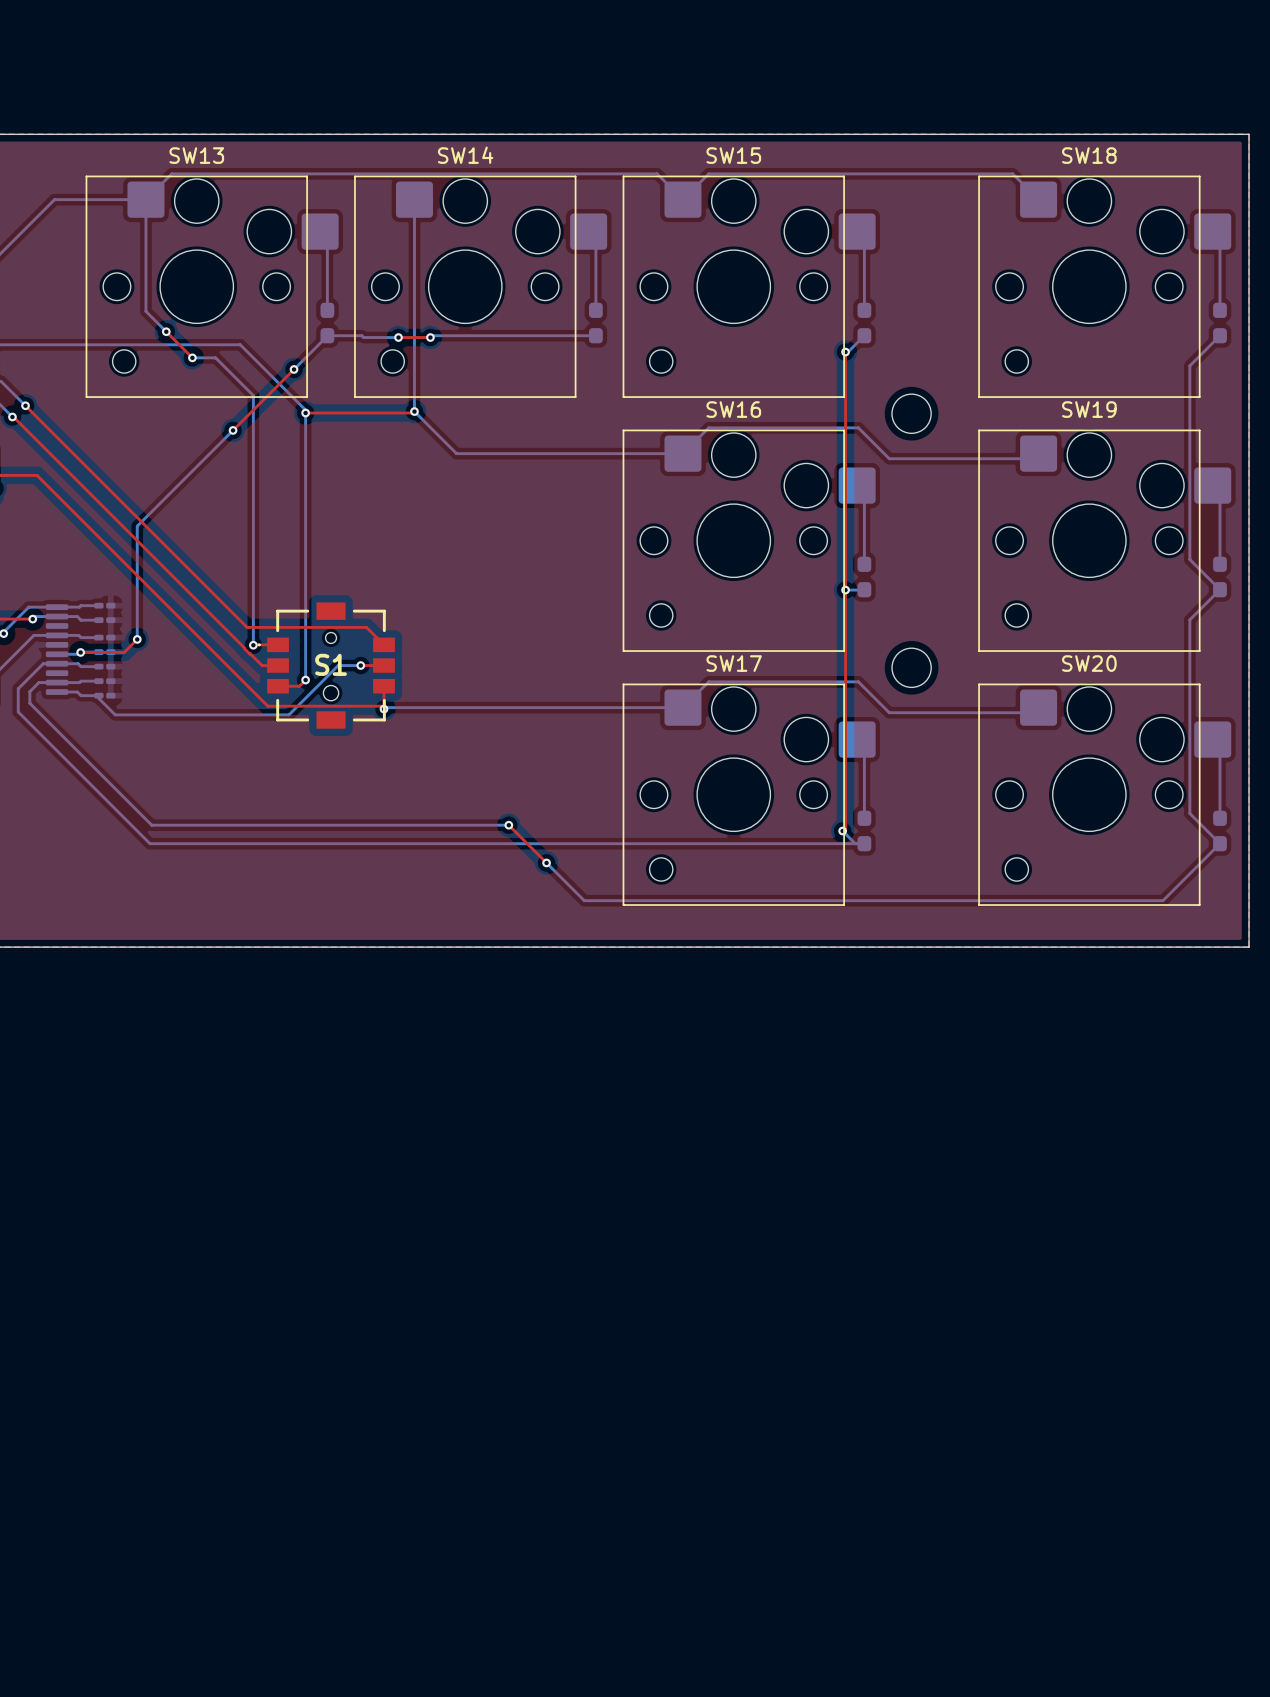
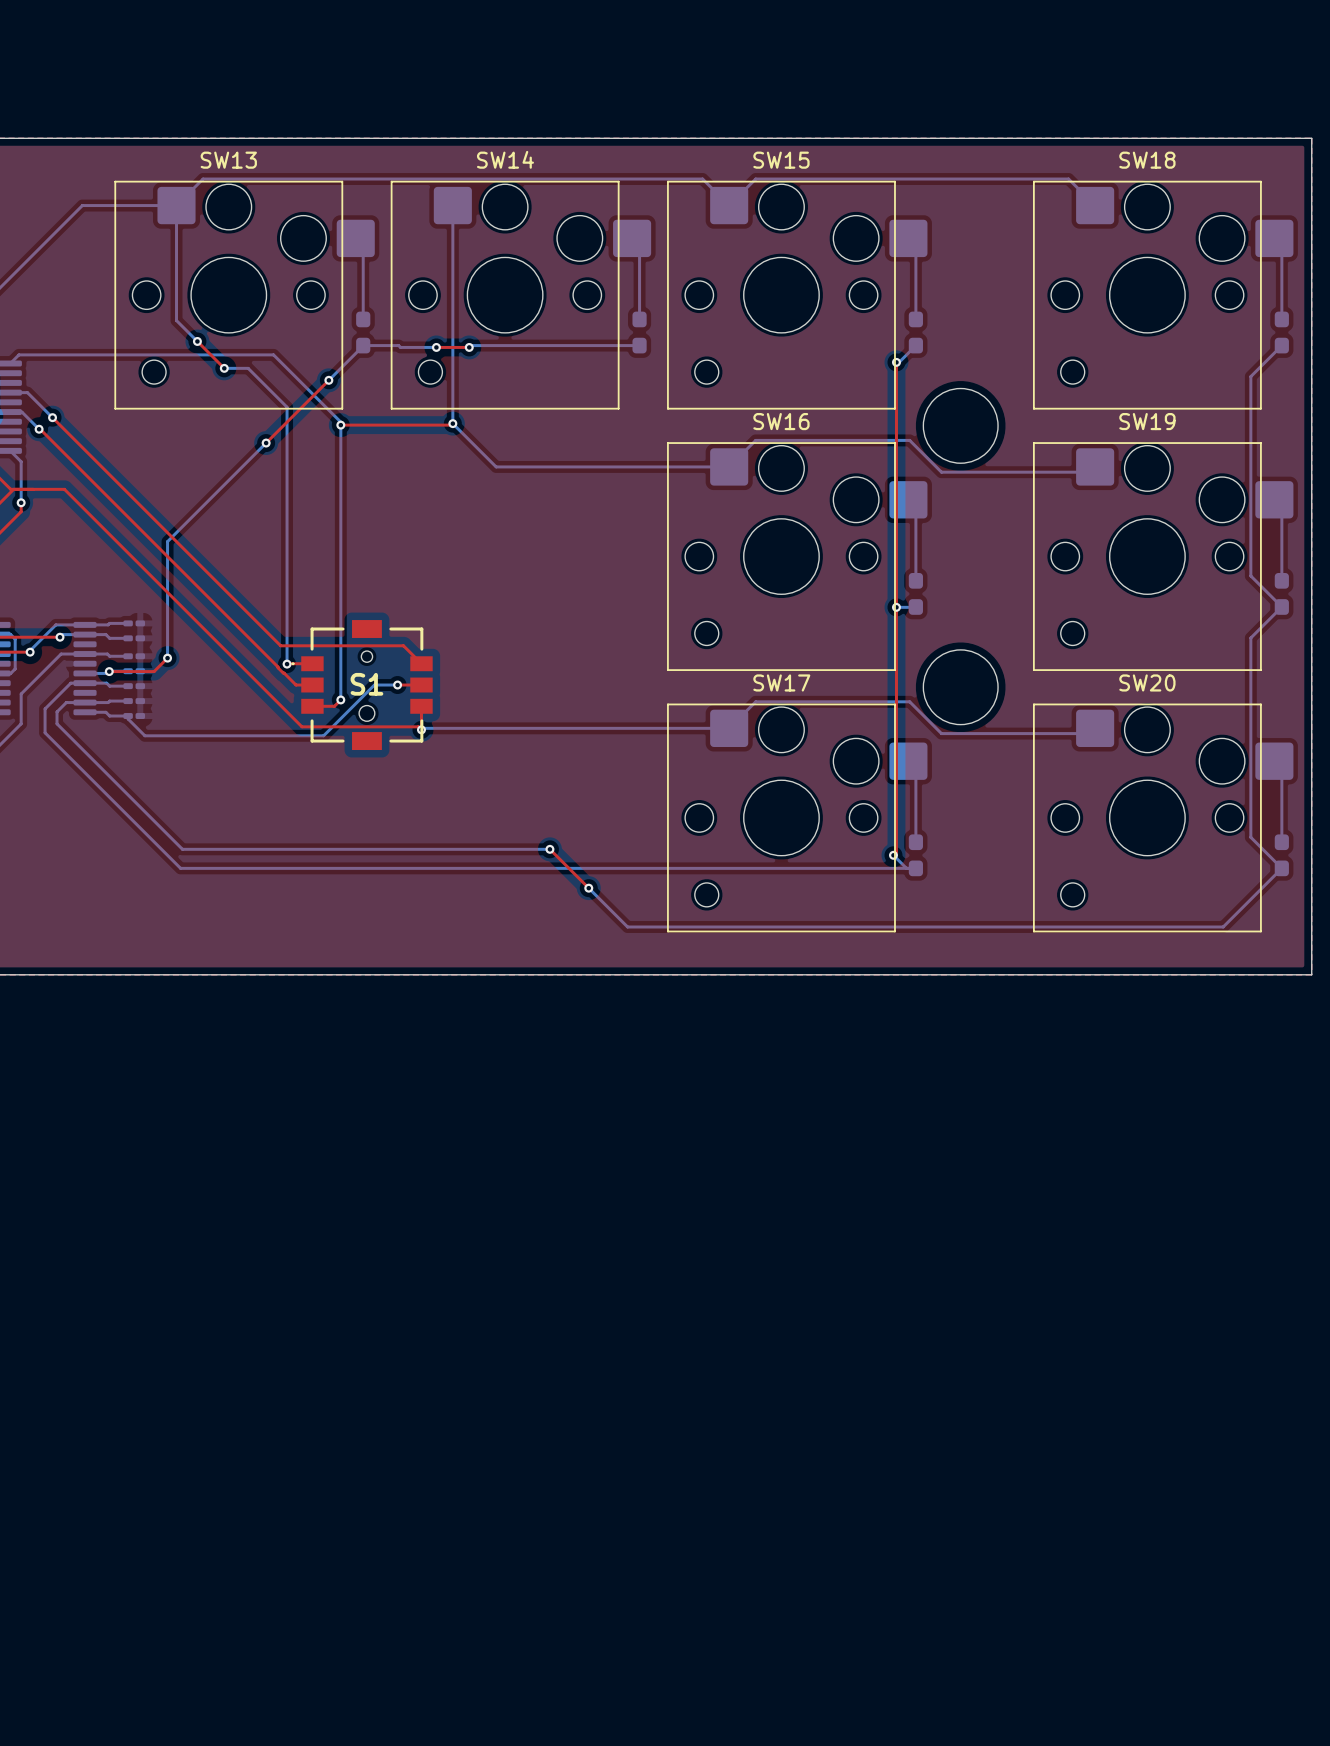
round board edge size: [891, 393, 932, 434] -> [922, 388, 999, 464]
round board edge size: [891, 647, 932, 688] -> [922, 649, 999, 725]

